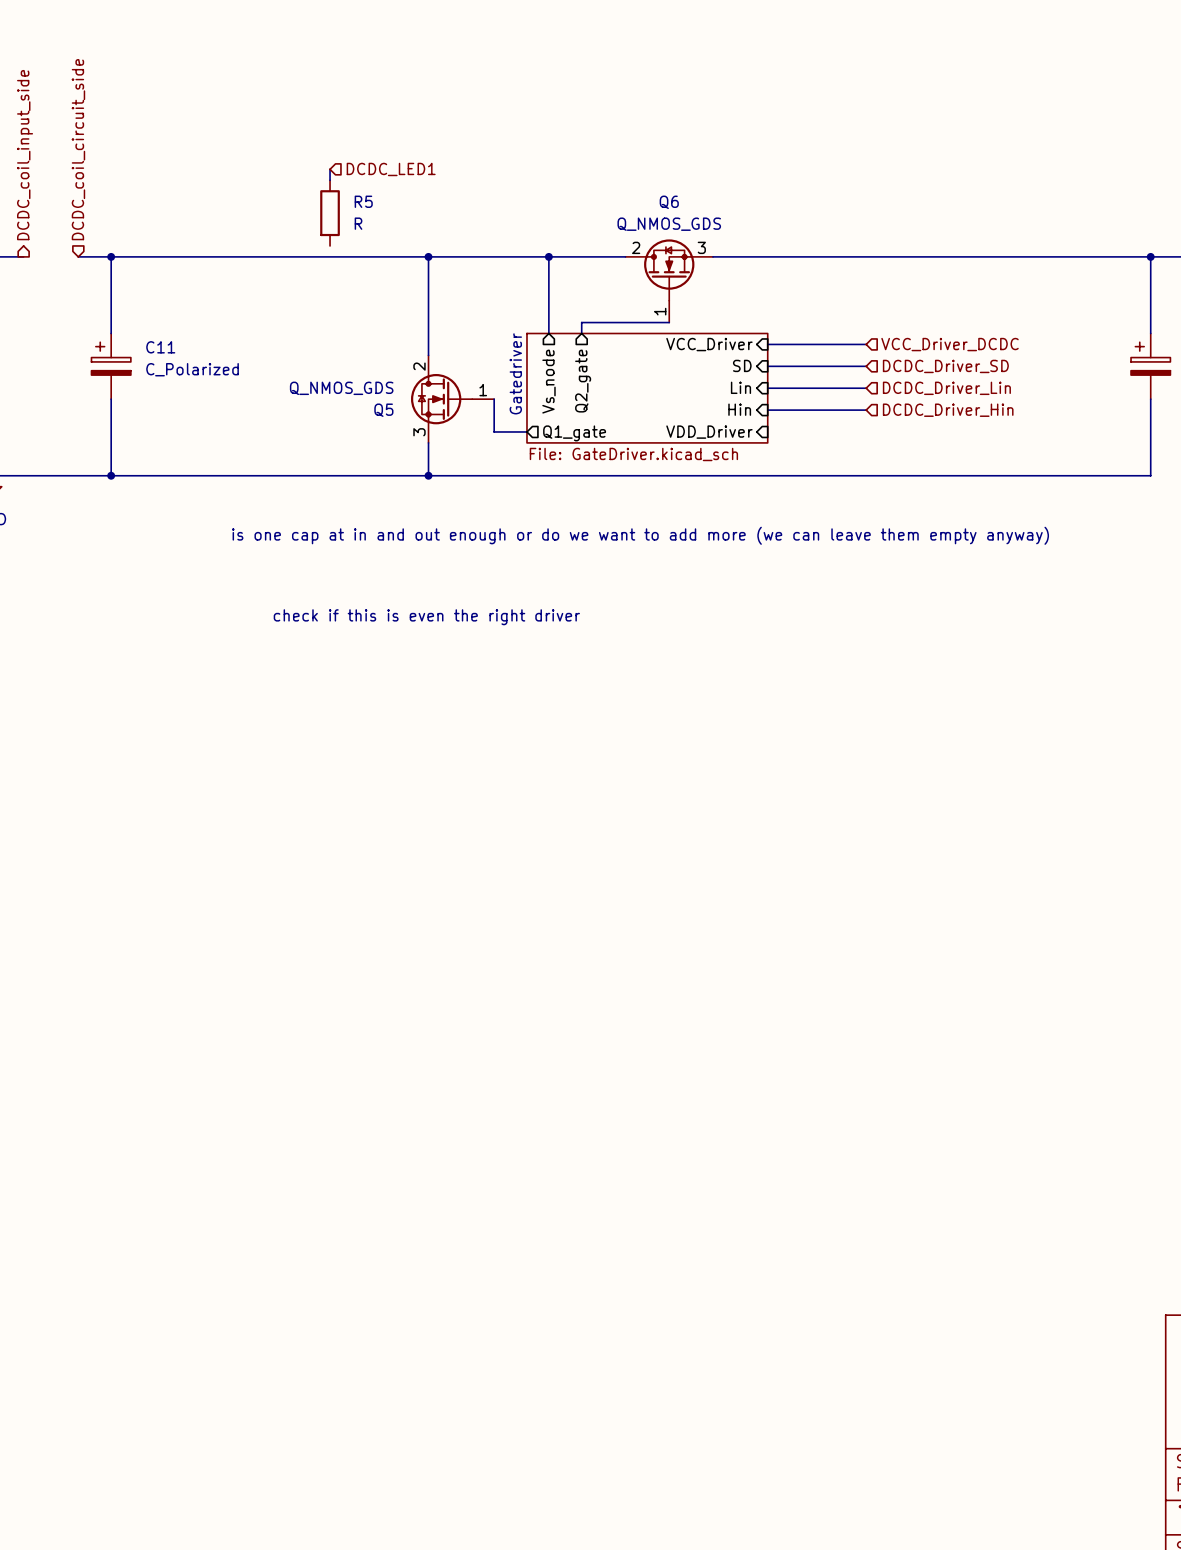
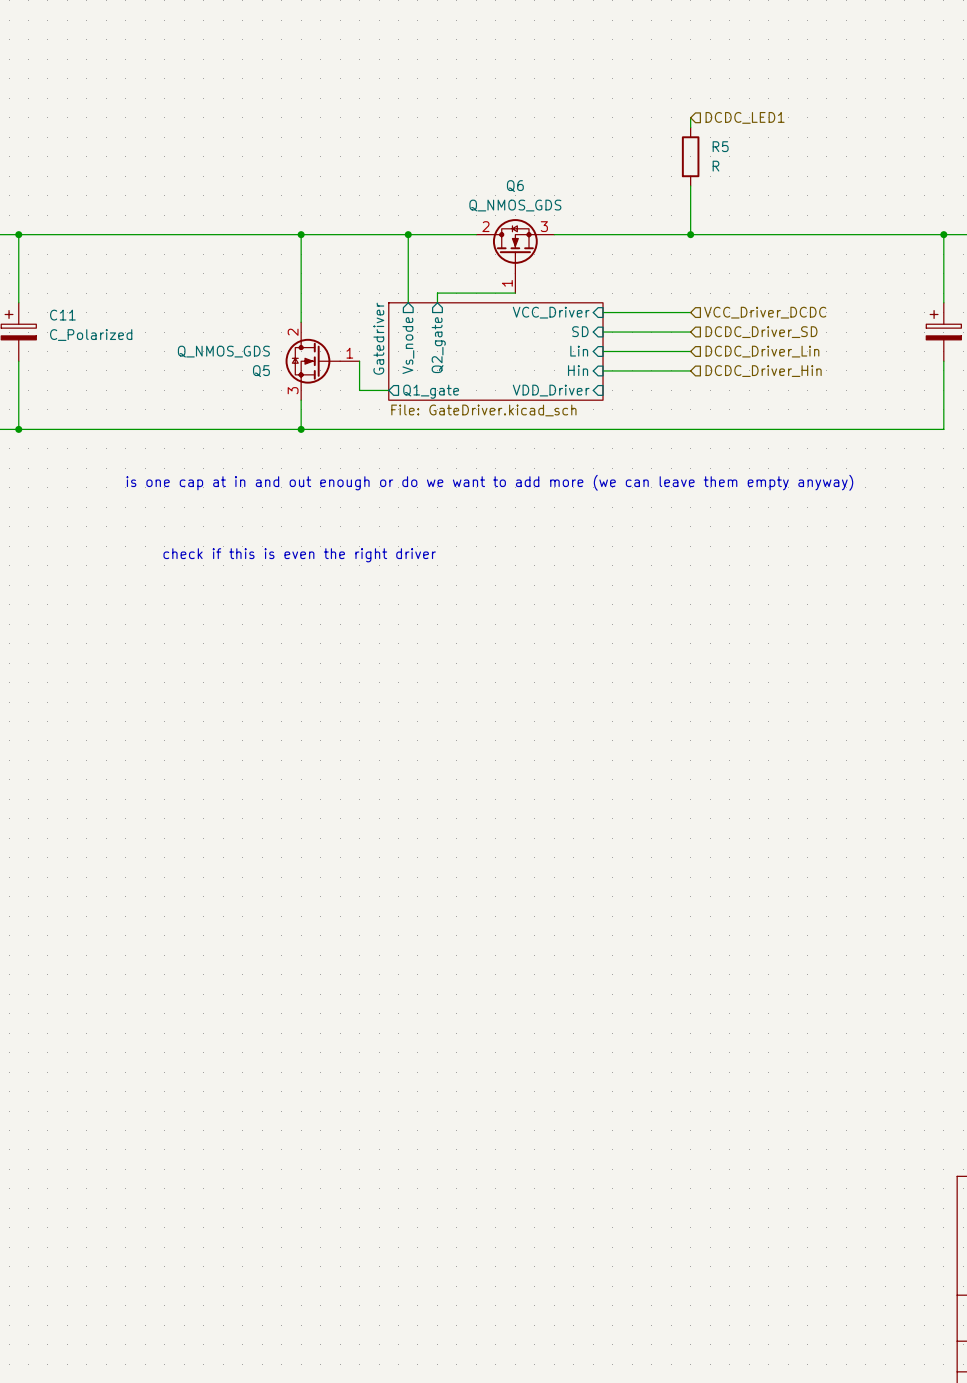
wire: none -> (690, 117) (690, 127)
hierarchical label: none -> DCDC_LED1 (745, 117)
wire: (330, 169) (330, 180) -> none
hierarchical label: DCDC_LED1 (391, 169) -> none
wire: none -> (690, 185) (690, 234)
R5 position: (330, 213) -> (690, 156)
junction: none -> (690, 234)

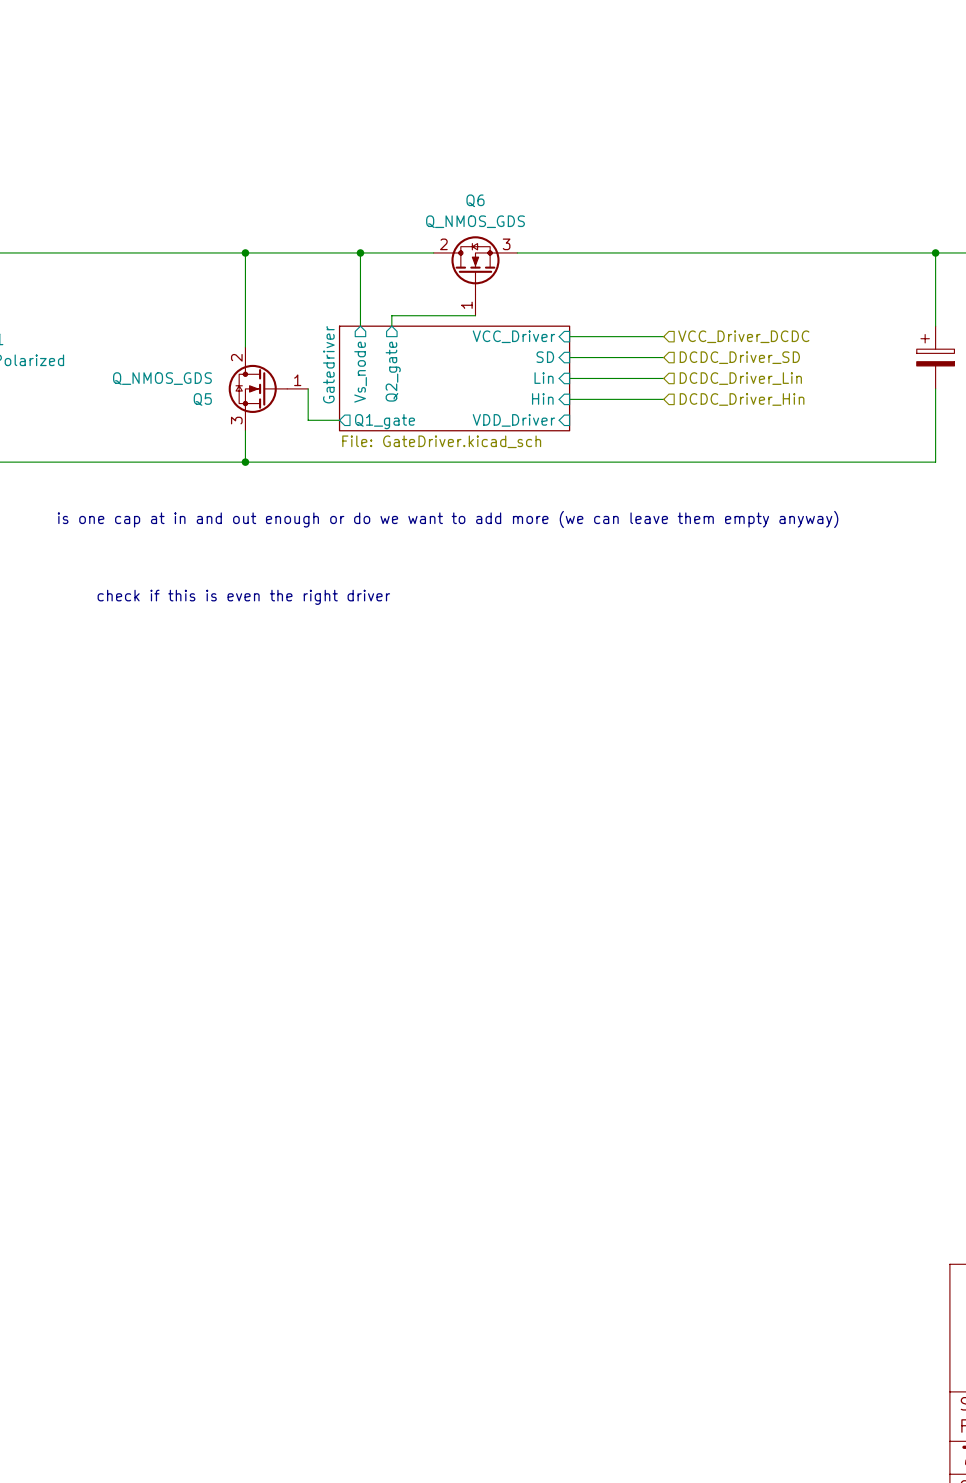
wire: (690, 117) (690, 127) -> none
hierarchical label: DCDC_LED1 (745, 117) -> none
R5: R (690, 156) -> none
wire: (690, 185) (690, 234) -> none
junction: (690, 234) -> none

